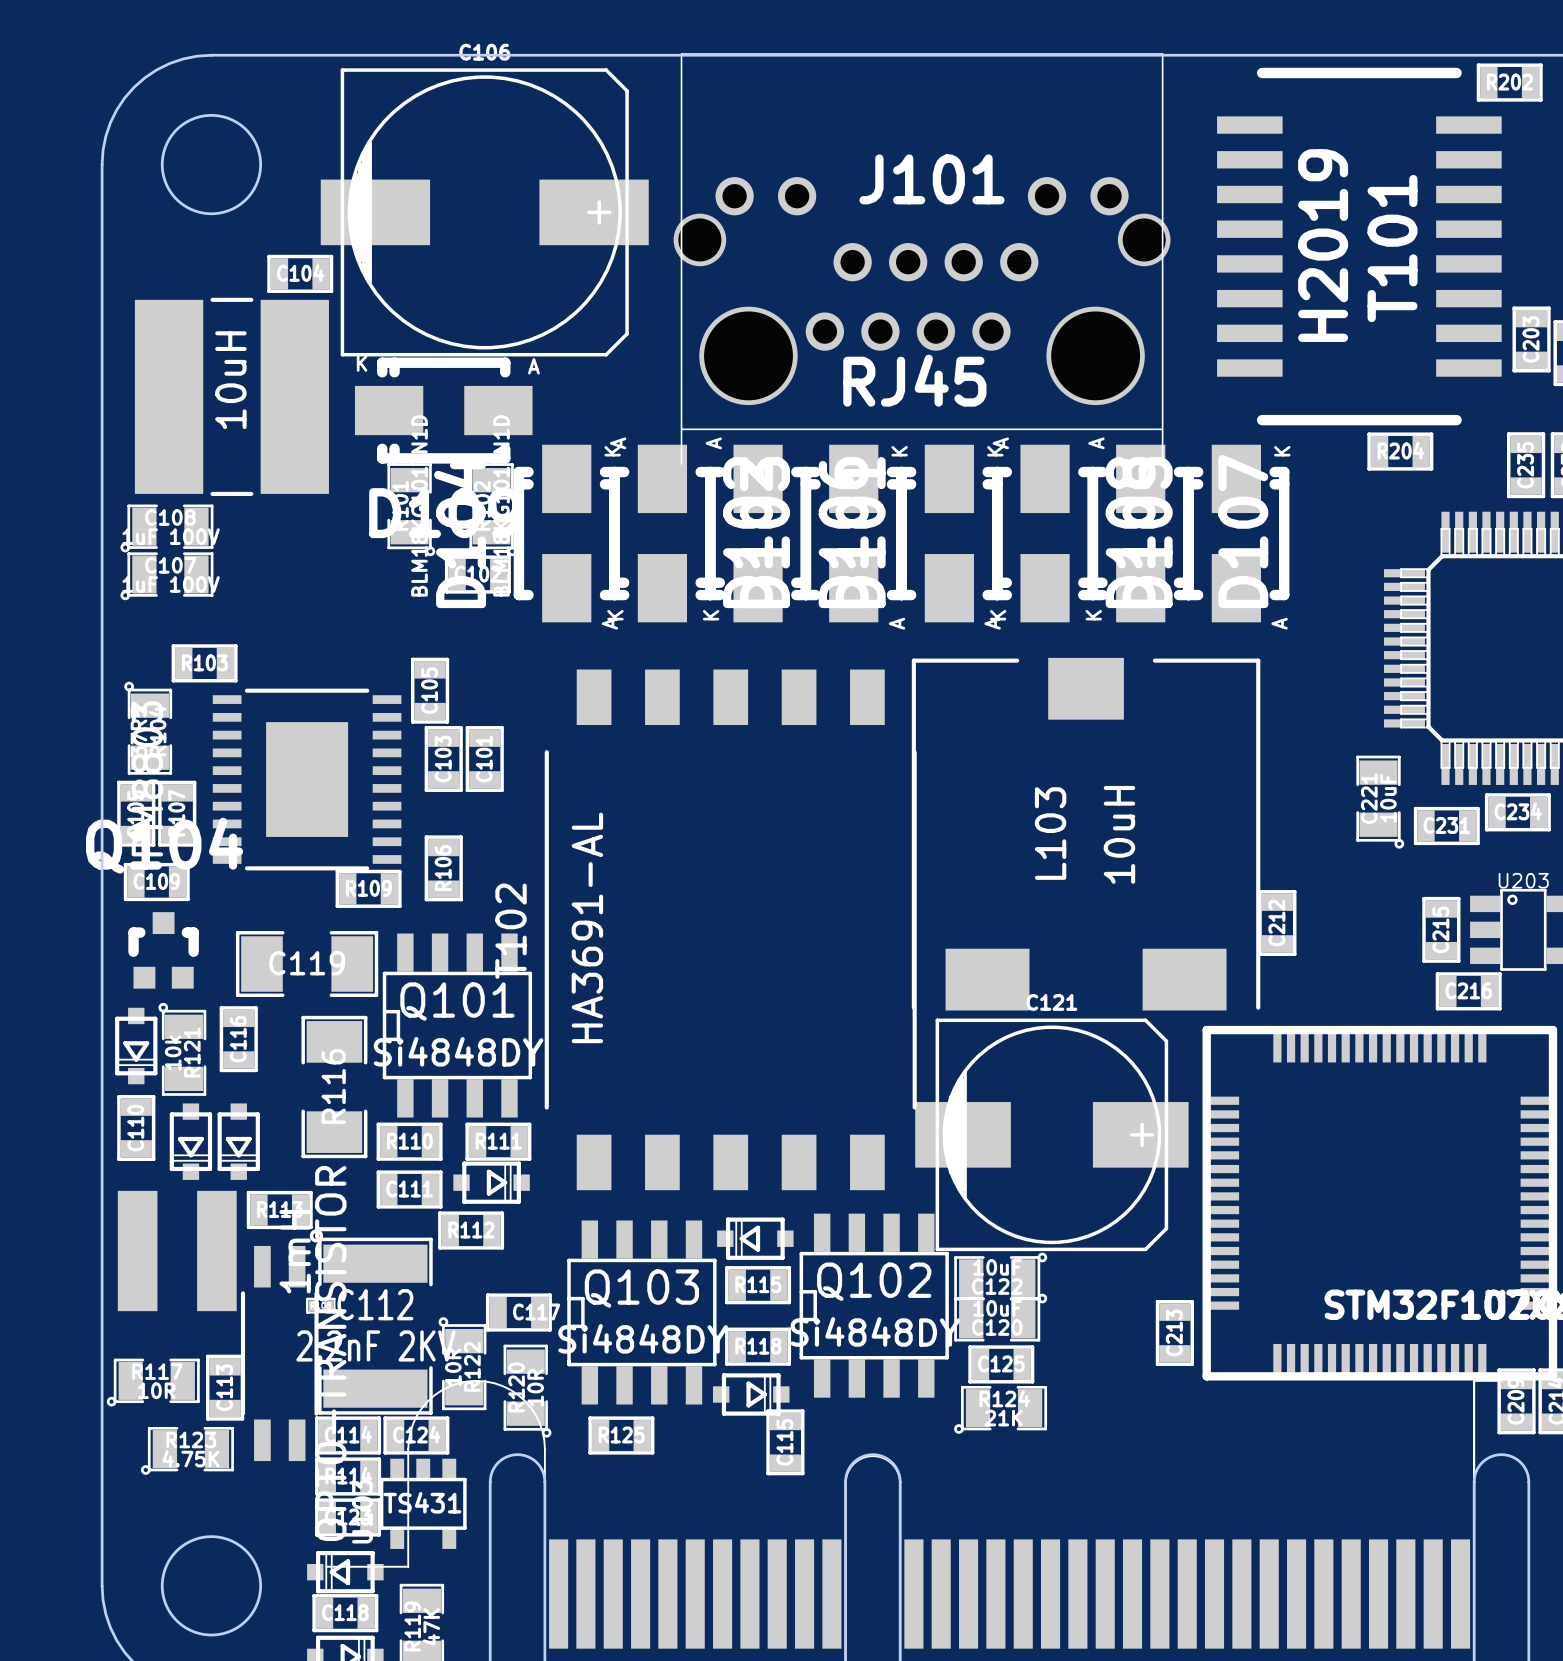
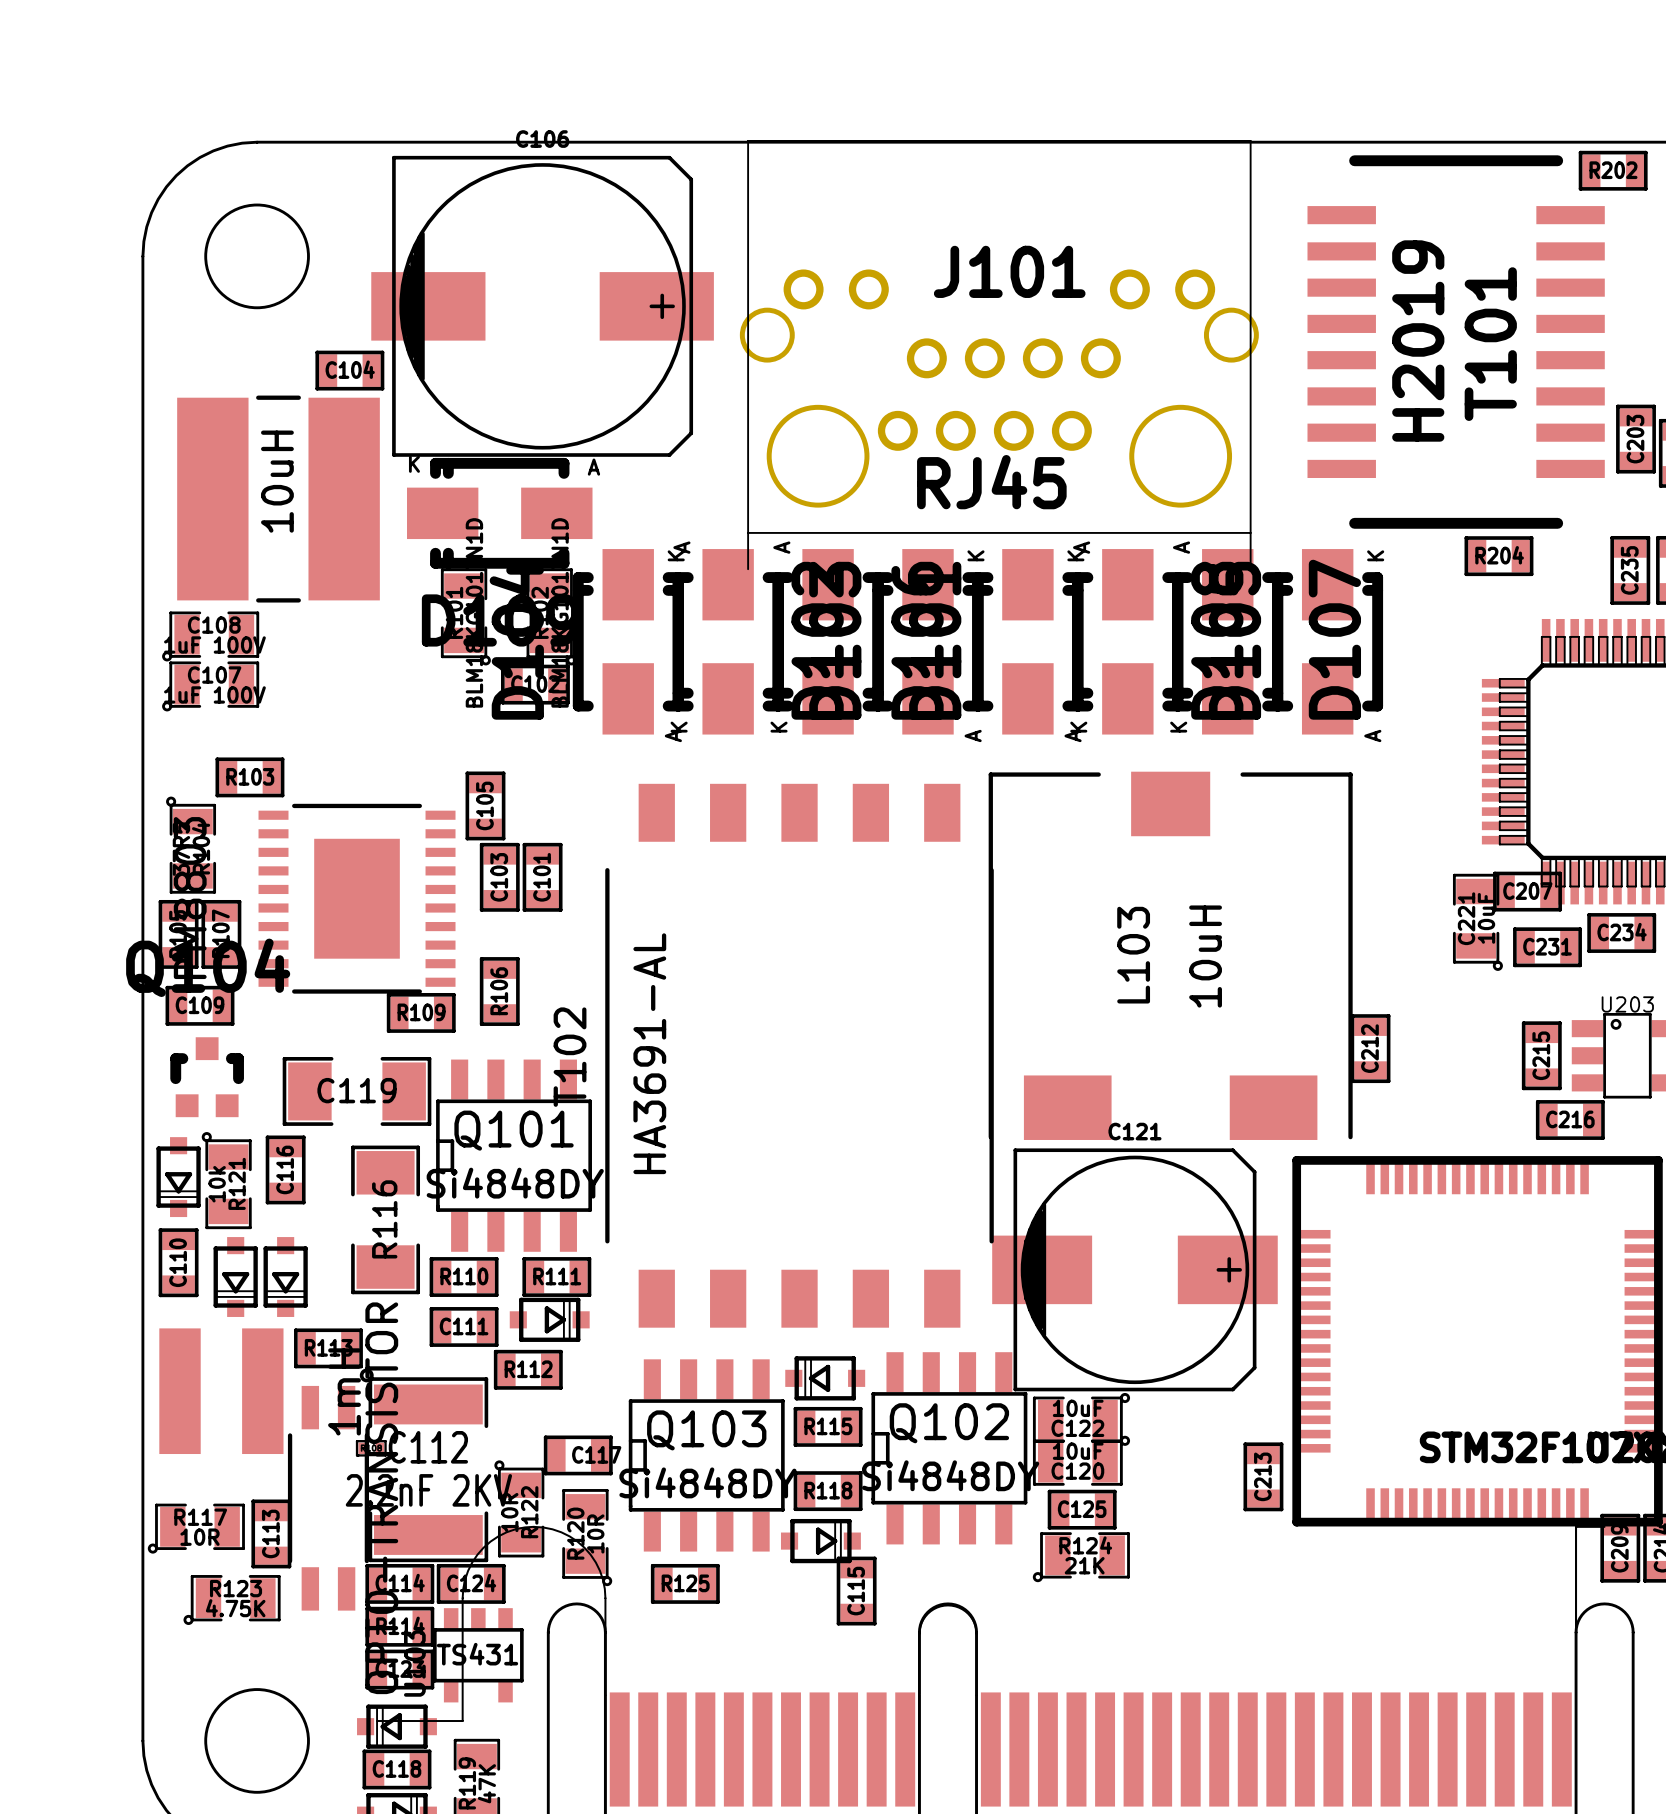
C207: none -> (1527, 891)

